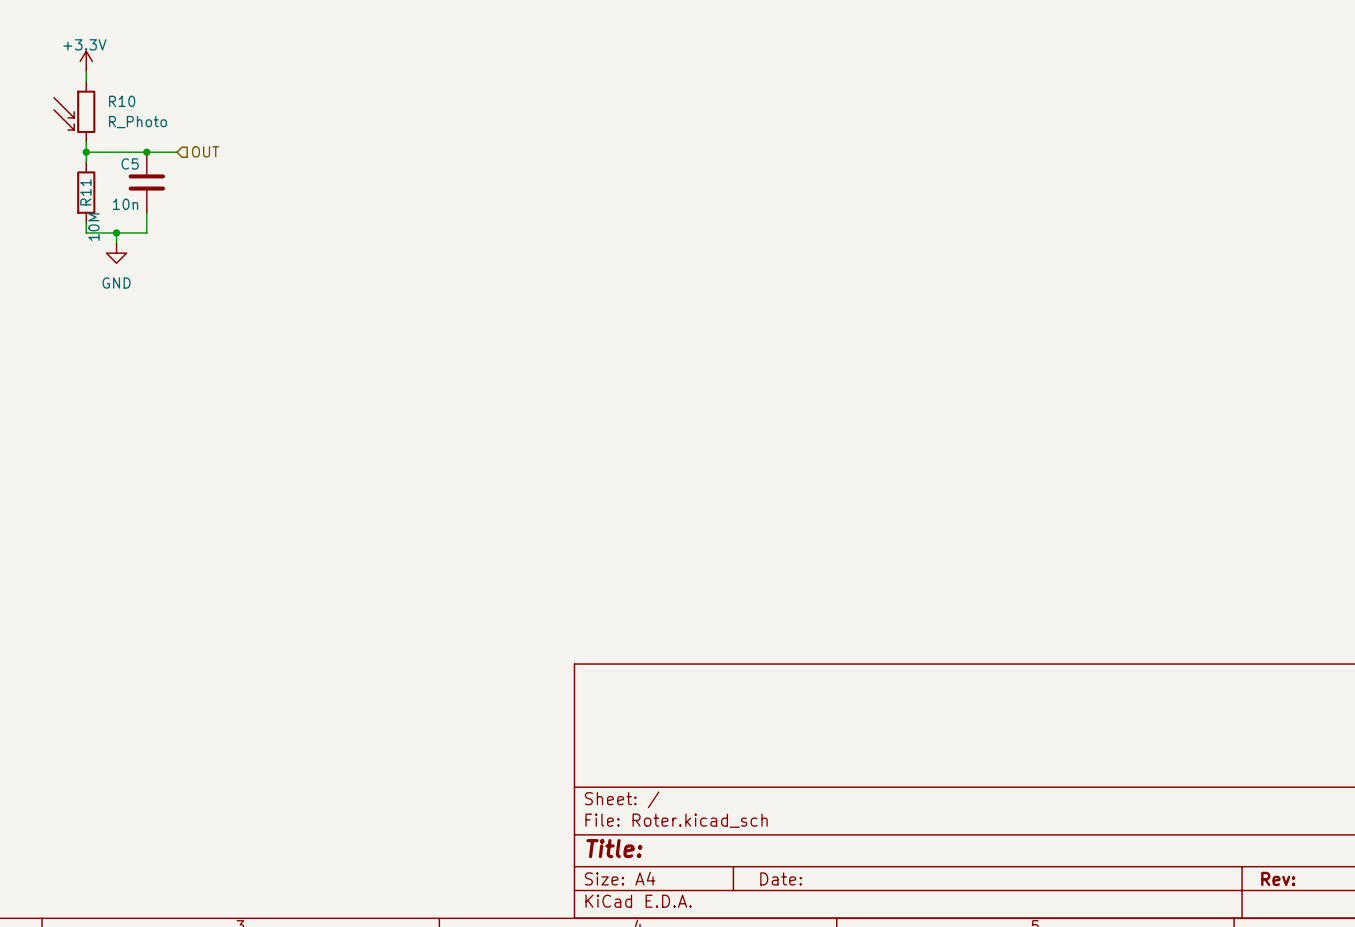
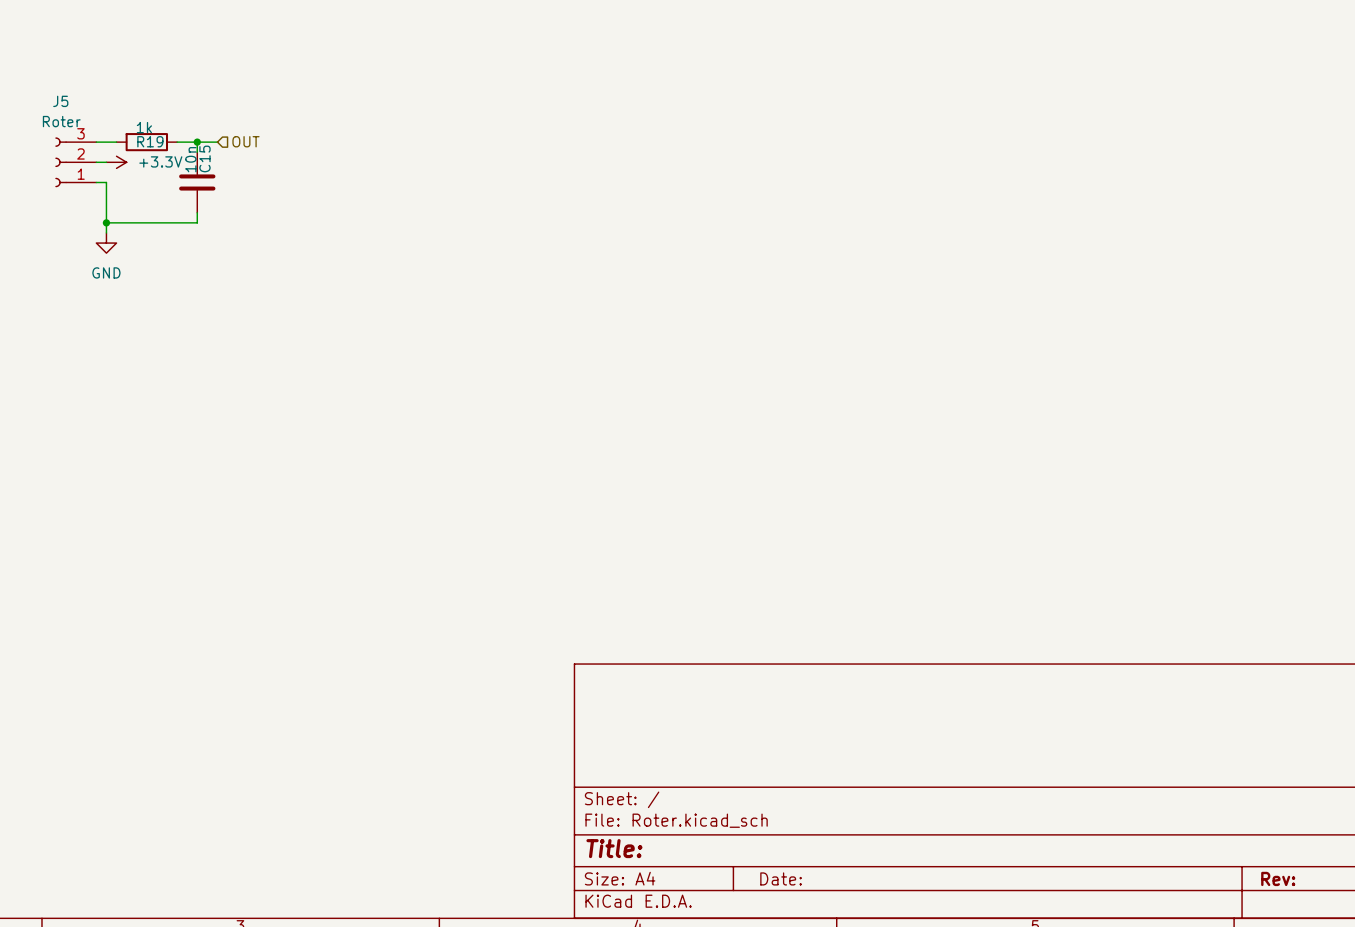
power symbol text position: +3.3V (84, 44) -> +3.3V (160, 161)
power symbol rotation: 0° (86, 61) -> 90° clockwise (116, 162)
power symbol position: +3.3V (86, 61) -> +3.3V (116, 162)
wire: (86, 71) (86, 81) -> none
R10: R_Photo (74, 111) -> none
wire: (86, 142) (86, 162) -> none
wire: none -> (96, 142) (116, 142)
R19: none -> 1k (146, 142)
wire: none -> (177, 142) (217, 142)
junction: none -> (197, 142)
hierarchical label position: OUT (205, 151) -> OUT (245, 141)
wire: (86, 152) (177, 152) -> none
junction: (86, 152) -> none
junction: (146, 152) -> none
J5: none -> Roter (75, 162)
wire: none -> (96, 162) (106, 162)
wire: none -> (96, 182) (106, 182) (106, 232)
C5: 10n (146, 182) -> none
C15: none -> 10n (197, 182)
R11: 10M (86, 192) -> none
wire: (146, 212) (146, 232) (86, 232) (86, 222) -> none
wire: none -> (197, 212) (197, 222) (106, 222)
wire: (116, 232) (116, 243) -> (197, 142) (197, 152)
junction position: (116, 232) -> (106, 222)
power symbol position: GND (116, 253) -> GND (106, 243)

